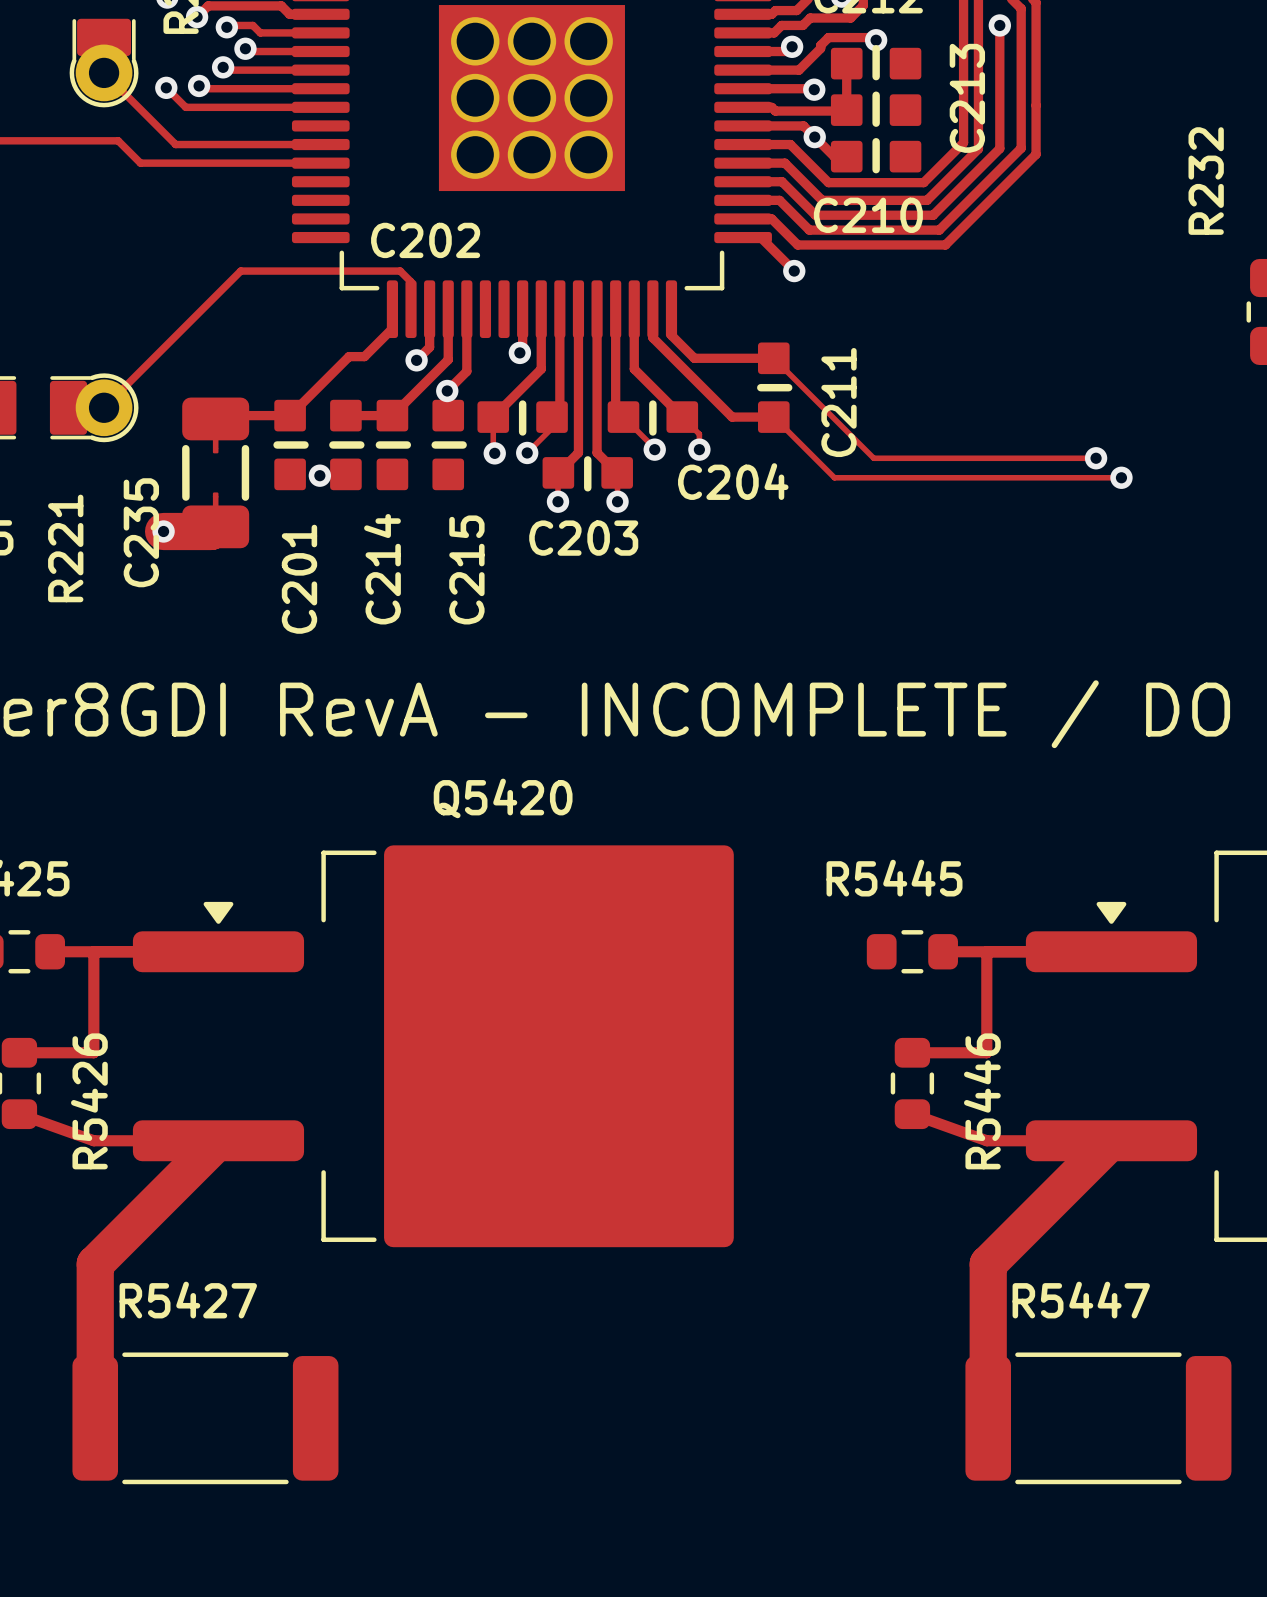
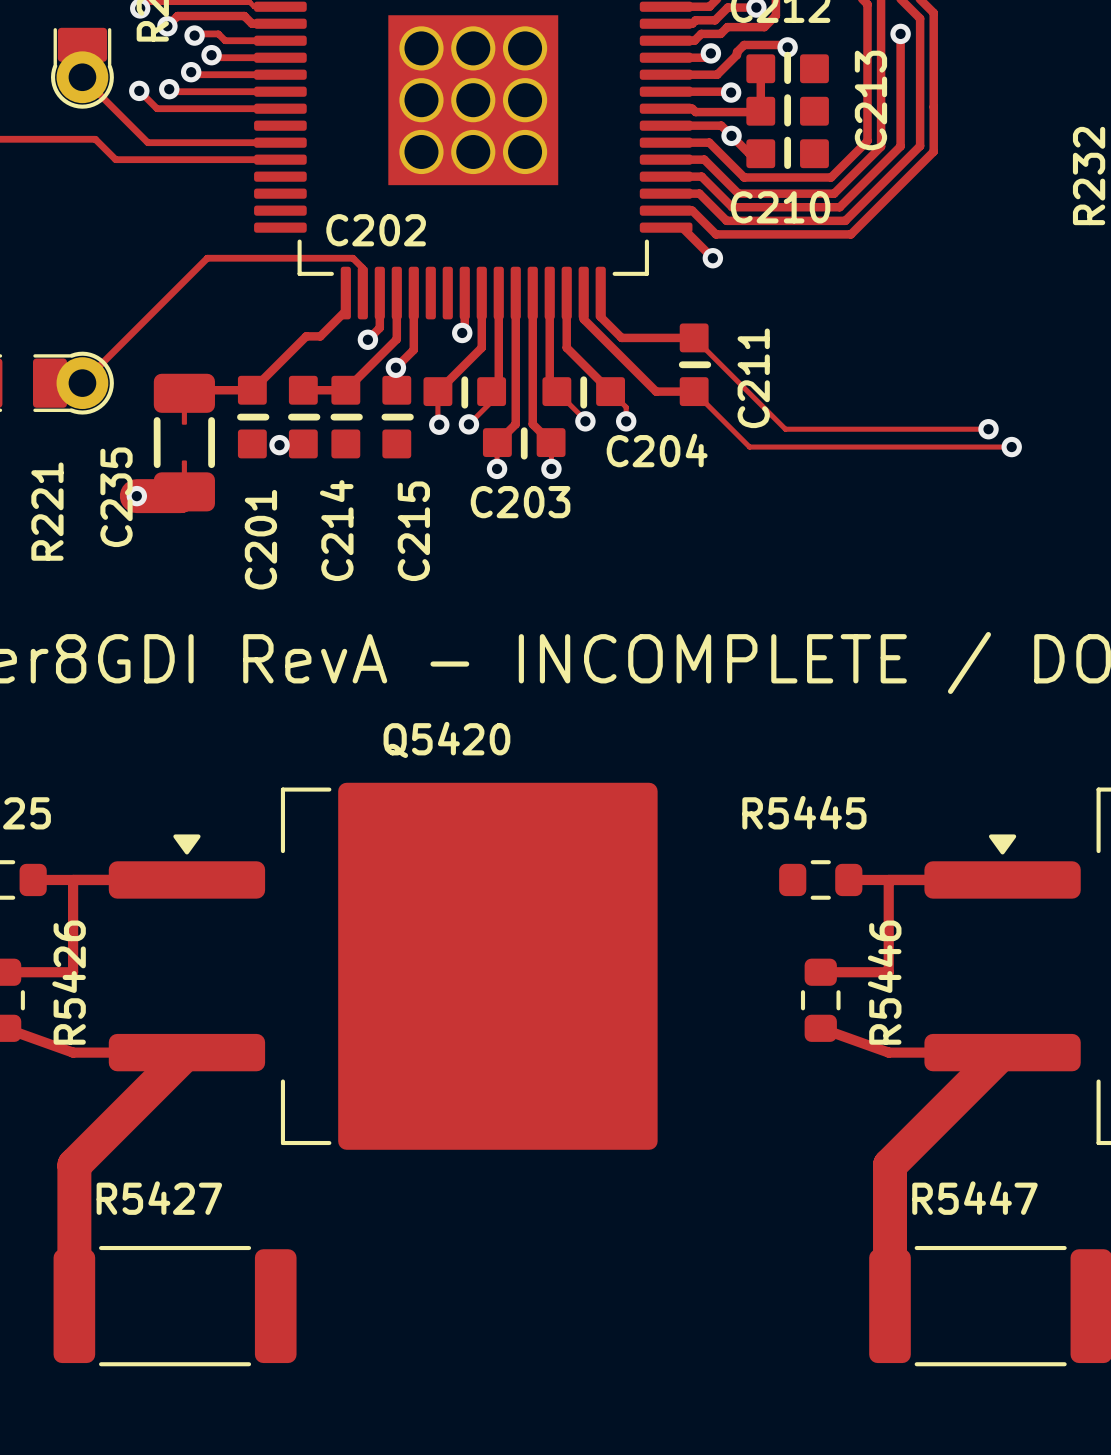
R5426 name position: R5426 (89, 1101) -> R5426 (69, 982)
R5446 name position: R5446 (982, 1101) -> R5446 (884, 982)

